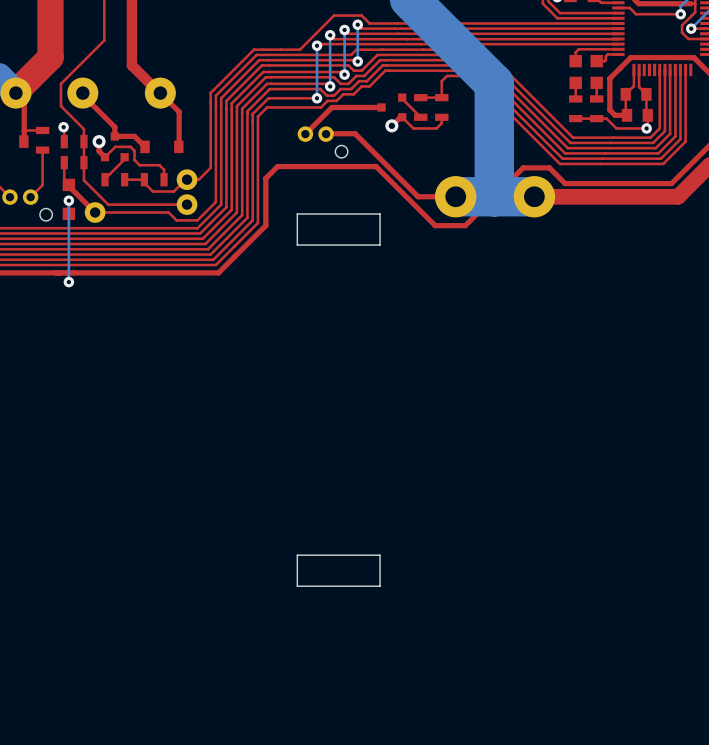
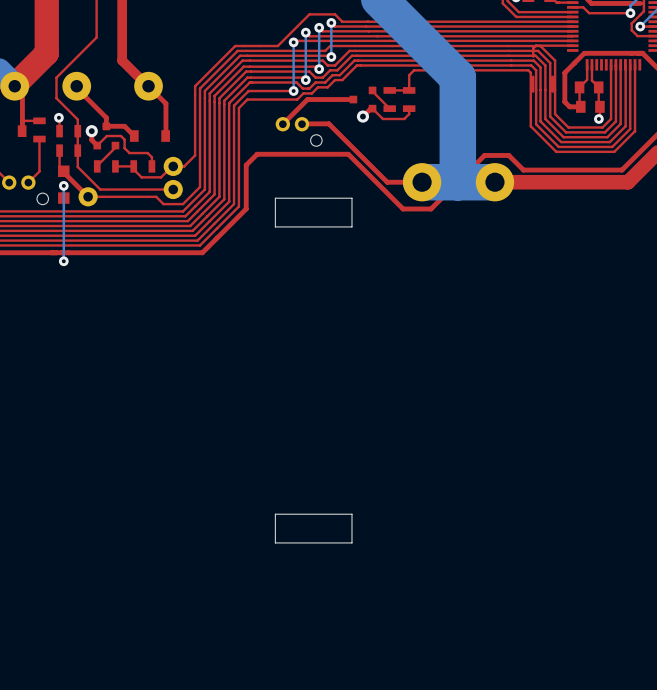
top track: (485, 49) (573, 137) (613, 137) -> (449, 46) (540, 46) (555, 60) (555, 114) (568, 127)
top track: (482, 54) (570, 142) (611, 142) -> (446, 50) (538, 50) (550, 63) (550, 116) (566, 132)
top track: (618, 54) (607, 54) (604, 61) (596, 61) -> none
top track: (479, 60) (567, 148) (608, 148) -> (444, 55) (535, 55) (545, 65) (545, 118) (563, 137)
top track: (477, 65) (565, 153) (605, 153) -> (442, 60) (533, 60) (540, 67) (540, 121) (561, 142)
top track: (474, 70) (562, 158) (603, 158) -> (439, 65) (531, 65) (536, 70) (536, 124) (558, 146)
part: (575, 72) -> none
part: (596, 72) -> none
top track: (471, 75) (559, 163) (600, 163) -> (437, 70) (528, 70) (530, 72) (530, 126) (556, 151)
part: (575, 108) -> none
part: (596, 108) -> none
top track: (575, 118) (606, 118) (616, 128) (646, 128) -> none

